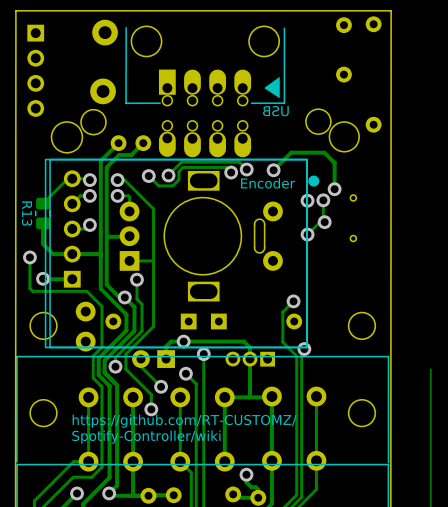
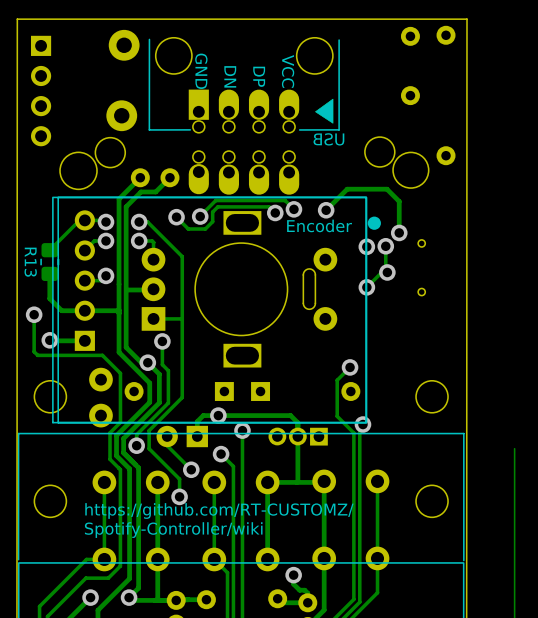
part footprint: [51, 26, 360, 158] -> [59, 37, 429, 195]

